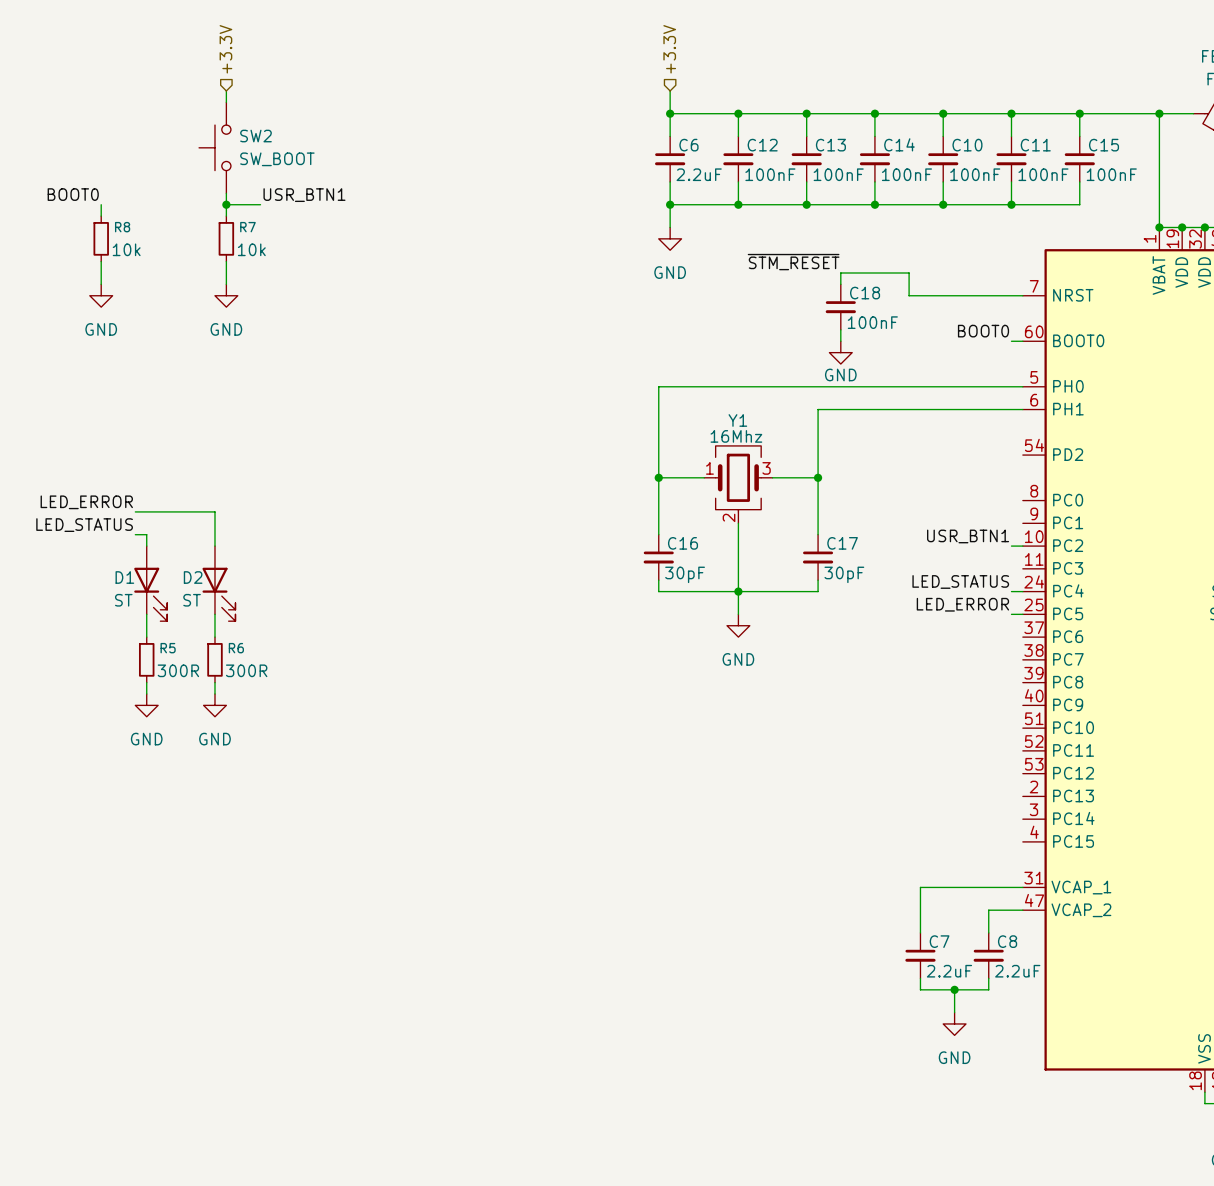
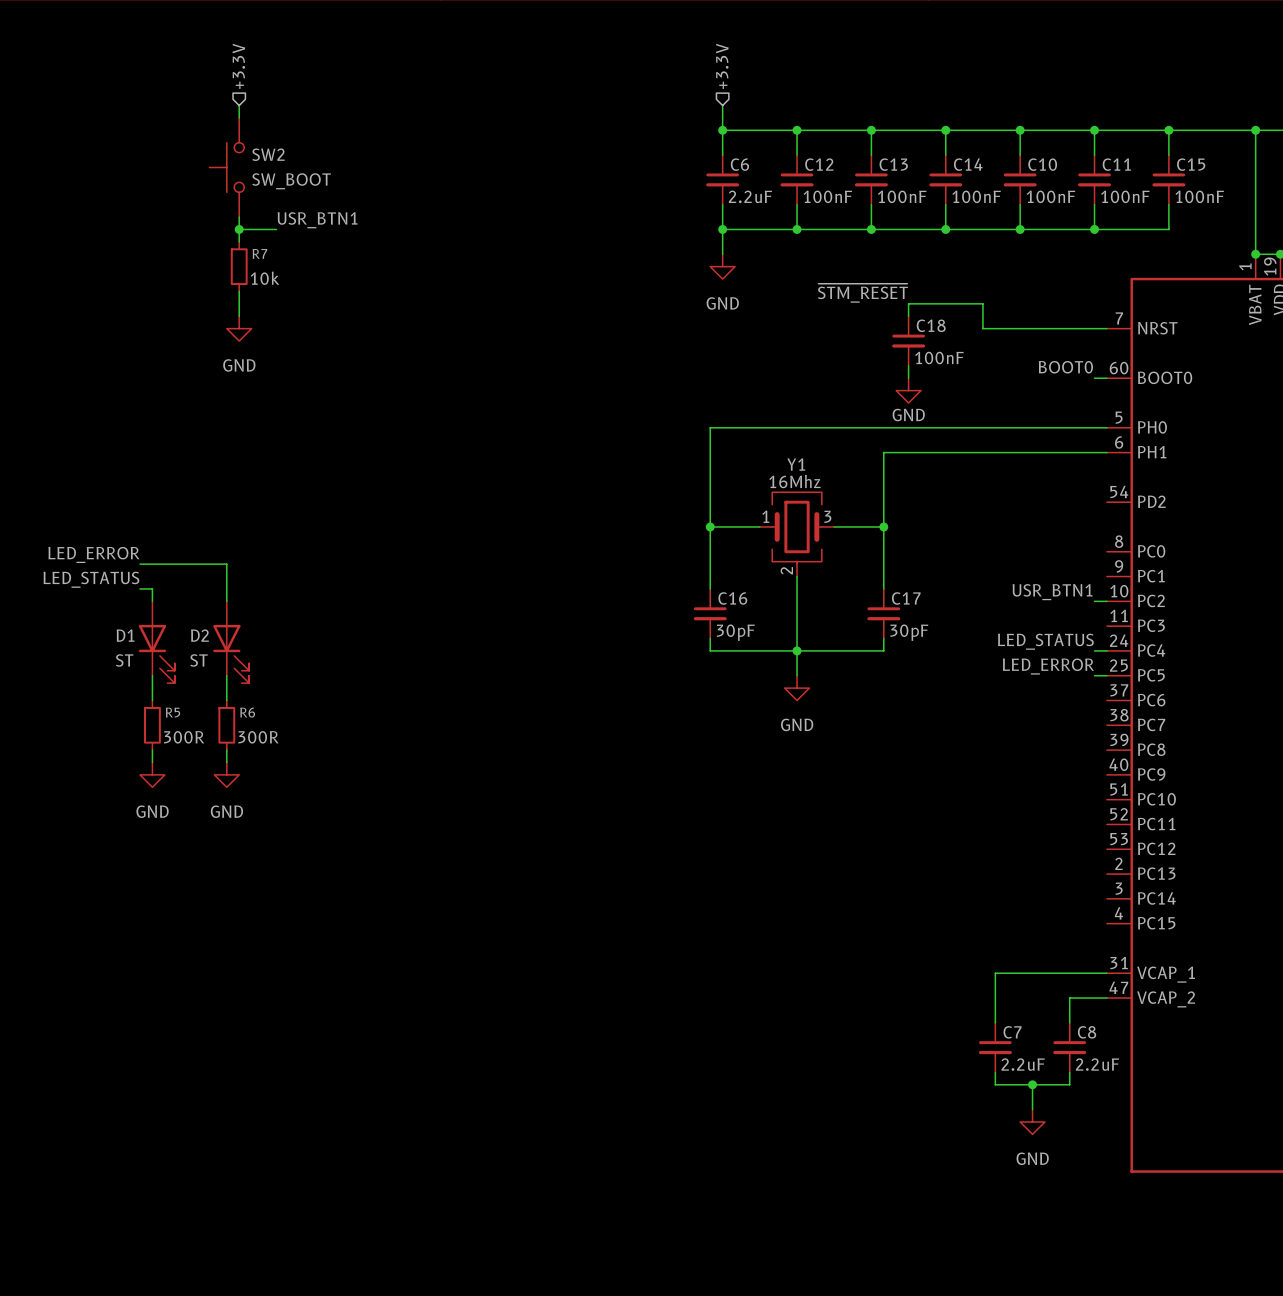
label: BOOT0 (73, 194) -> none
wire: (101, 204) (101, 216) -> none
R8: 10k (101, 238) -> none
wire: (101, 261) (101, 284) -> none
power symbol: GND (101, 295) -> none

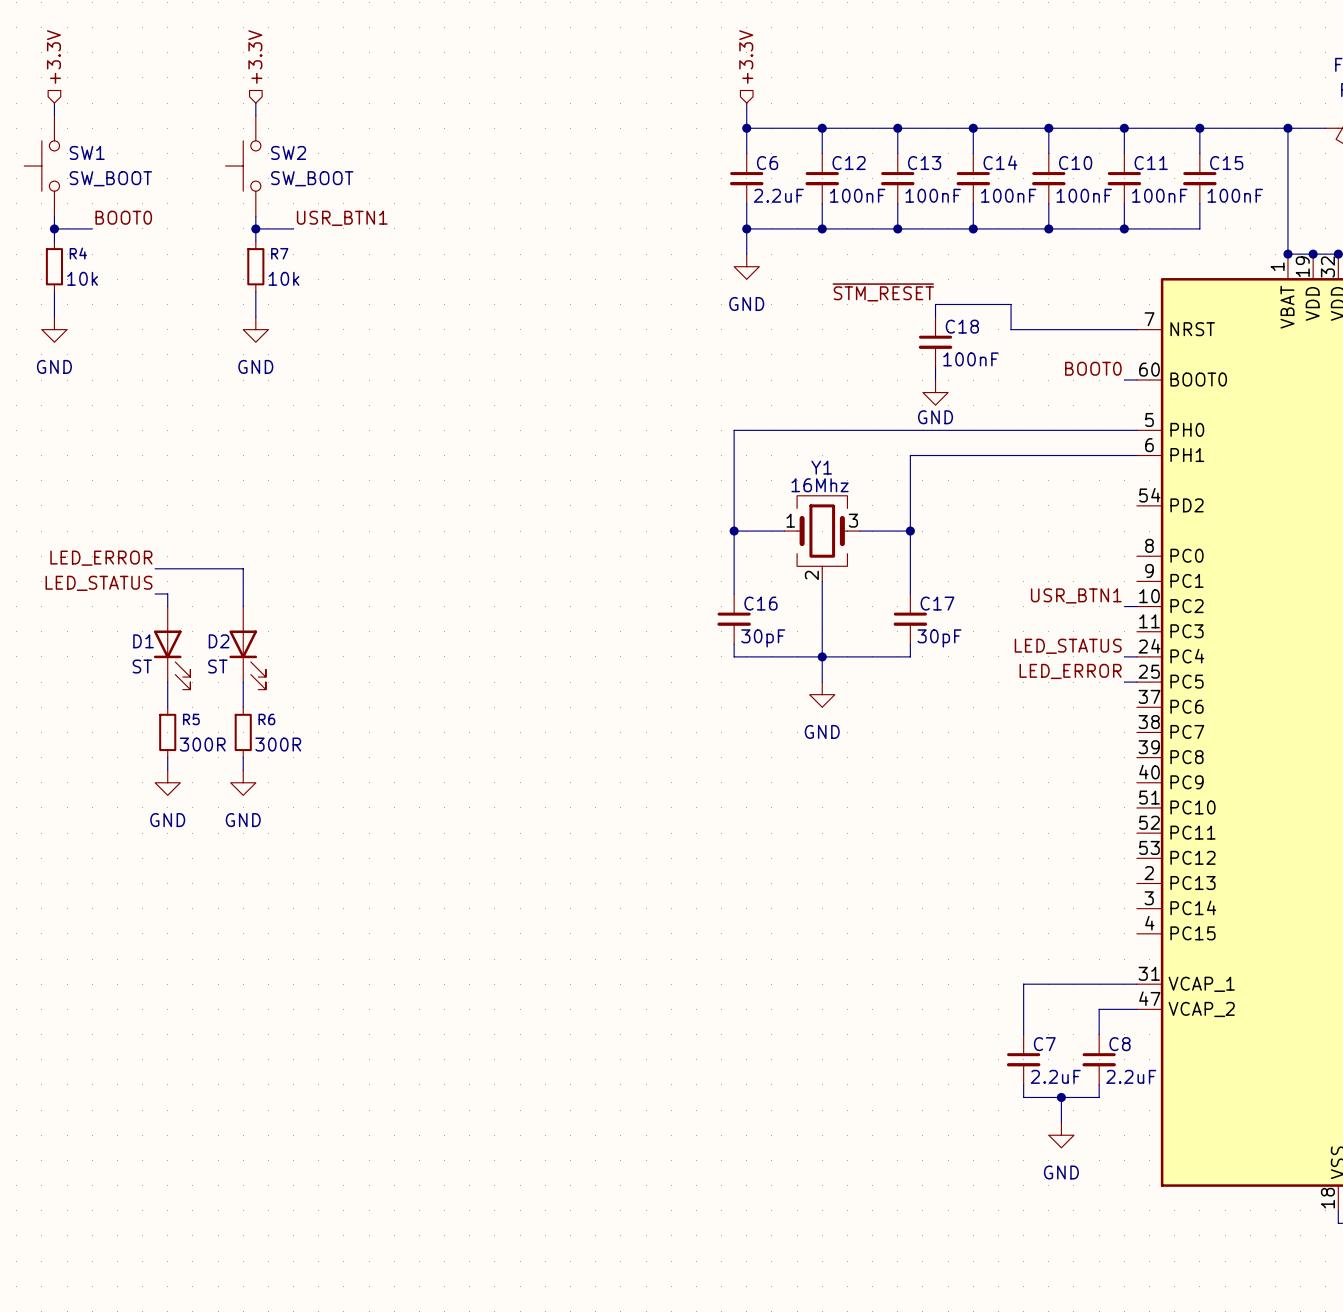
hierarchical label: none -> +3.3V (53, 57)
wire: none -> (54, 103) (54, 115)
SW1: none -> SW_BOOT (41, 166)
wire: none -> (54, 216) (54, 241)
label: none -> BOOT0 (123, 217)
wire: none -> (54, 228) (92, 228)
junction: none -> (54, 228)
R4: none -> 10k (54, 266)
wire: none -> (54, 291) (54, 317)
power symbol: none -> GND (54, 329)

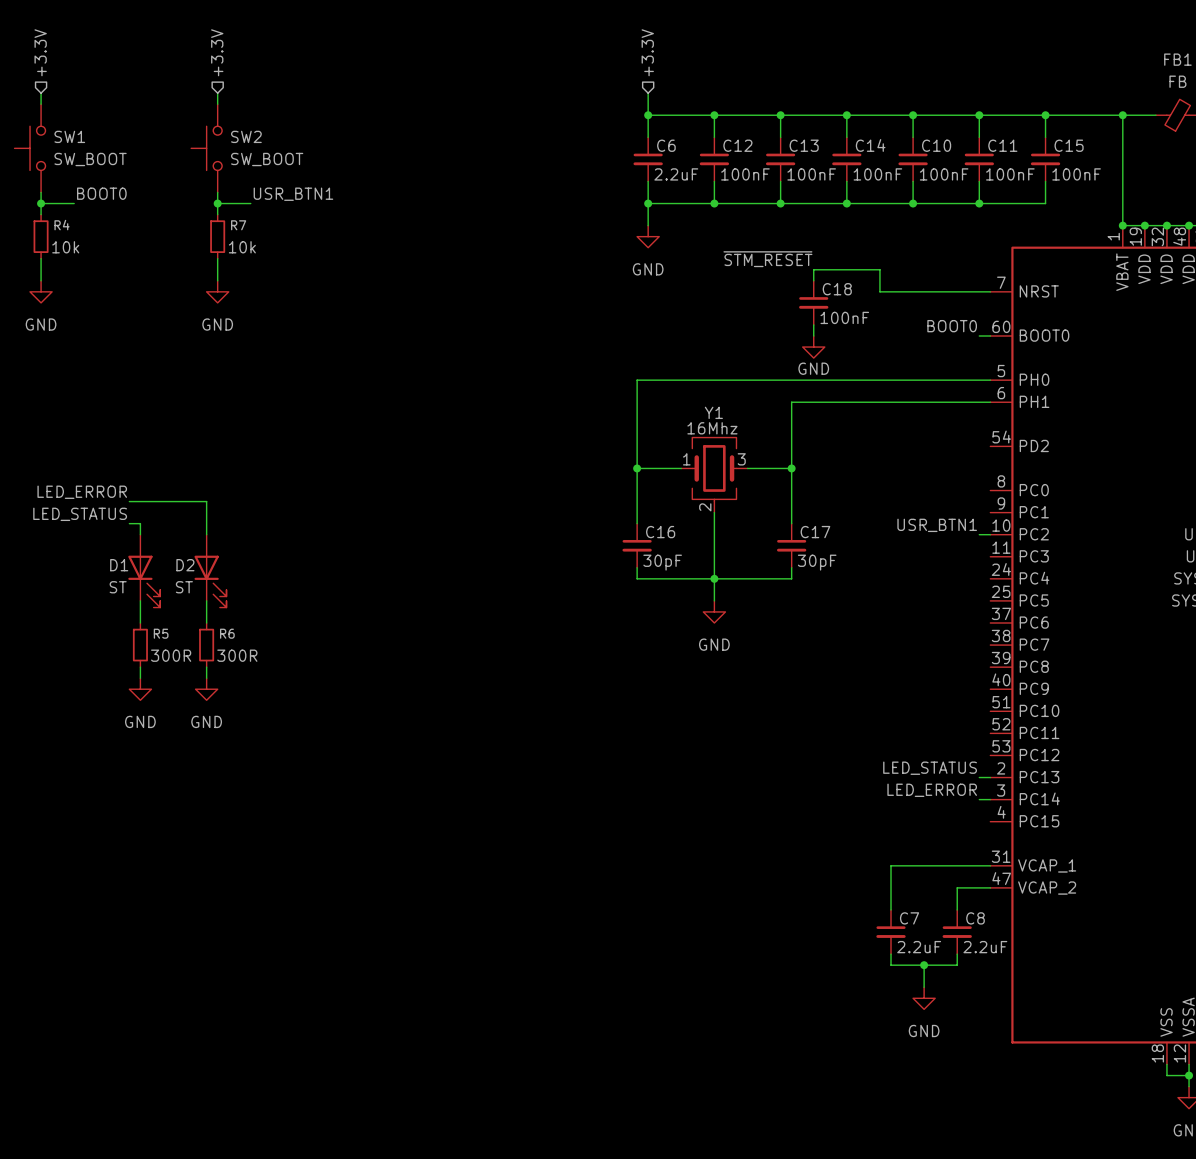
label position: LED_STATUS (1068, 646) -> LED_STATUS (930, 768)
wire: (1124, 656) (1136, 656) -> none
label position: LED_ERROR (1070, 671) -> LED_ERROR (932, 790)
wire: (1124, 682) (1136, 682) -> (979, 777) (990, 777)
wire: none -> (979, 799) (990, 799)

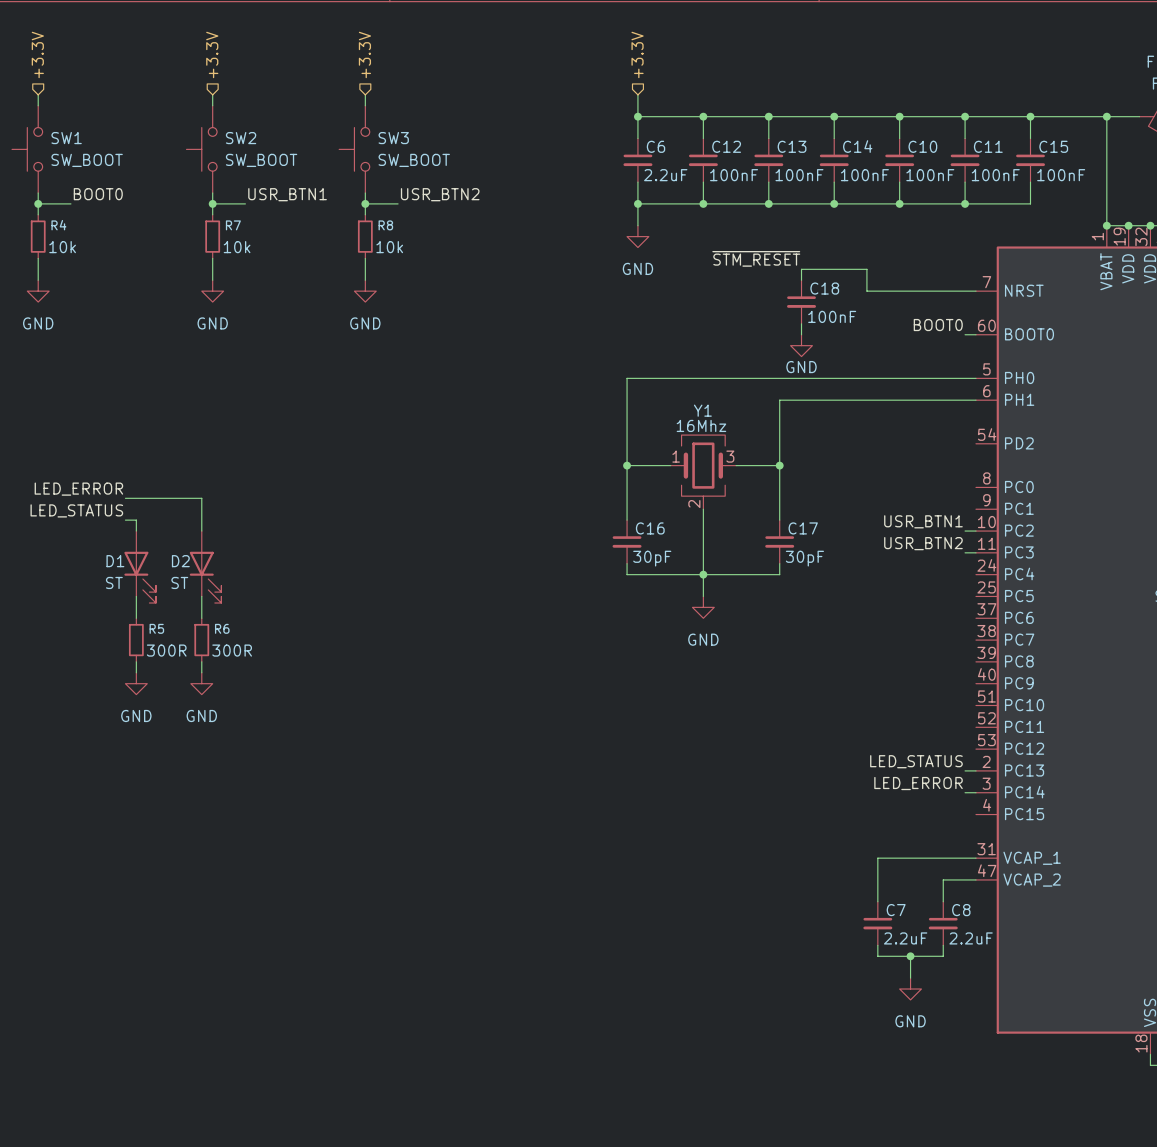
hierarchical label: none -> +3.3V (364, 54)
wire: none -> (365, 94) (365, 105)
SW3: none -> SW_BOOT (354, 149)
wire: none -> (365, 193) (365, 214)
label: none -> USR_BTN2 (440, 194)
wire: none -> (365, 203) (398, 203)
junction: none -> (365, 203)
R8: none -> 10k (365, 236)
wire: none -> (365, 258) (365, 280)
power symbol: none -> GND (365, 291)
label: none -> USR_BTN2 (923, 543)
wire: none -> (965, 552) (975, 552)

